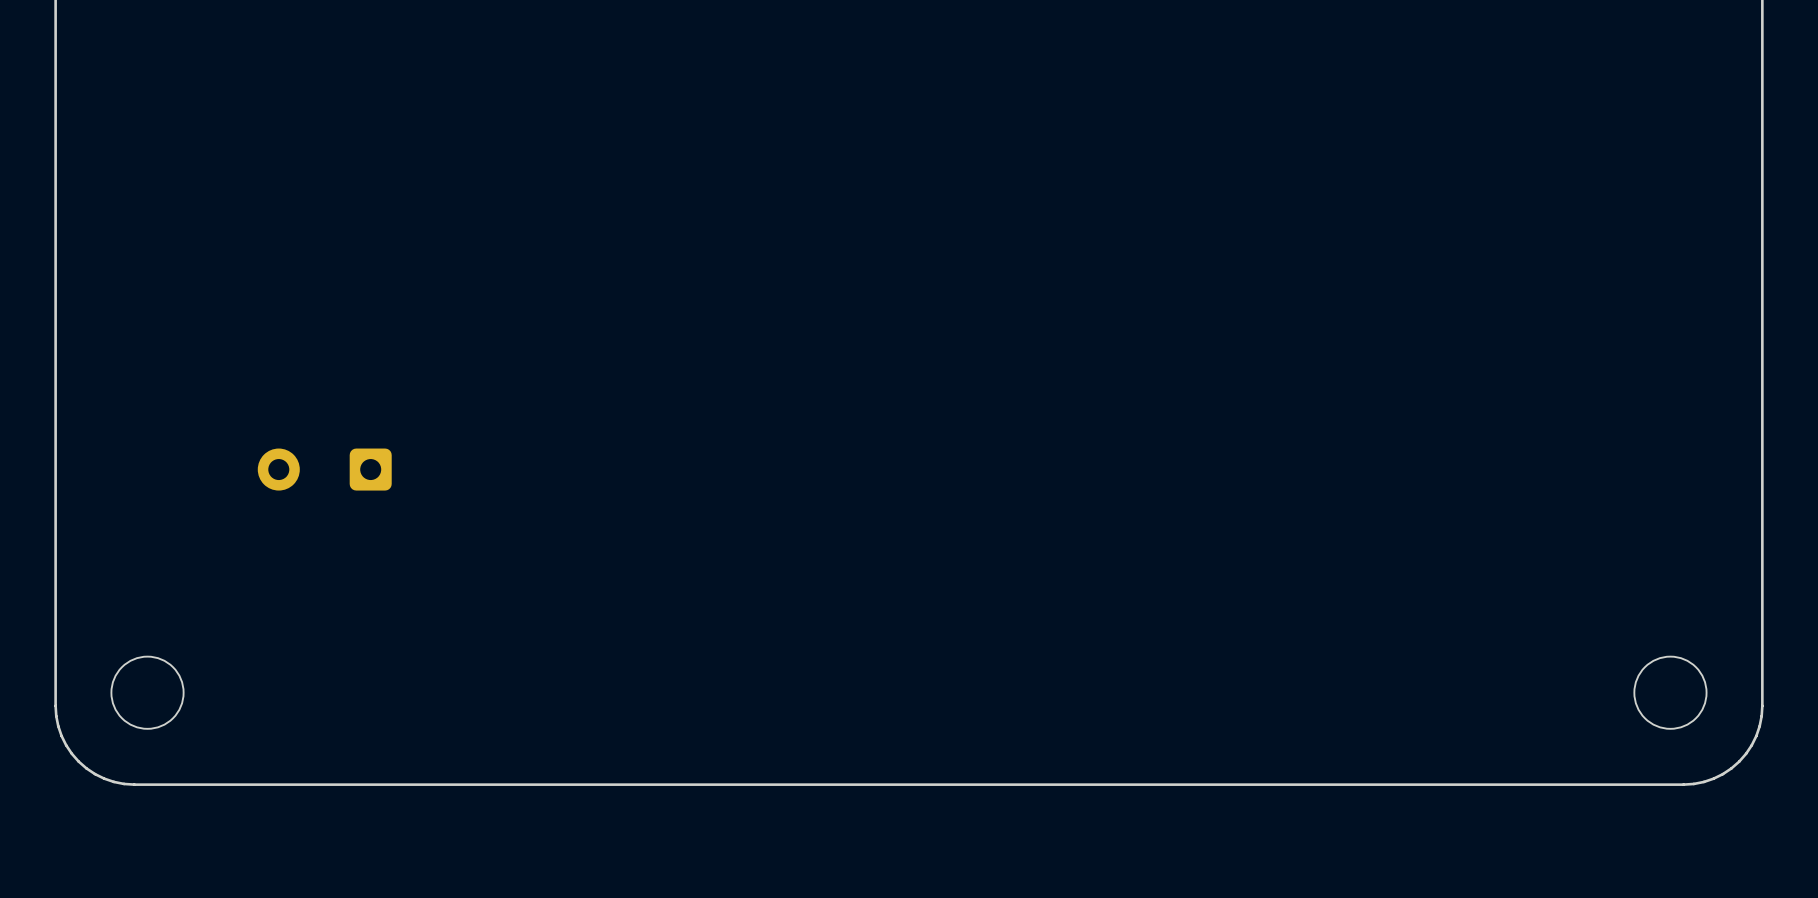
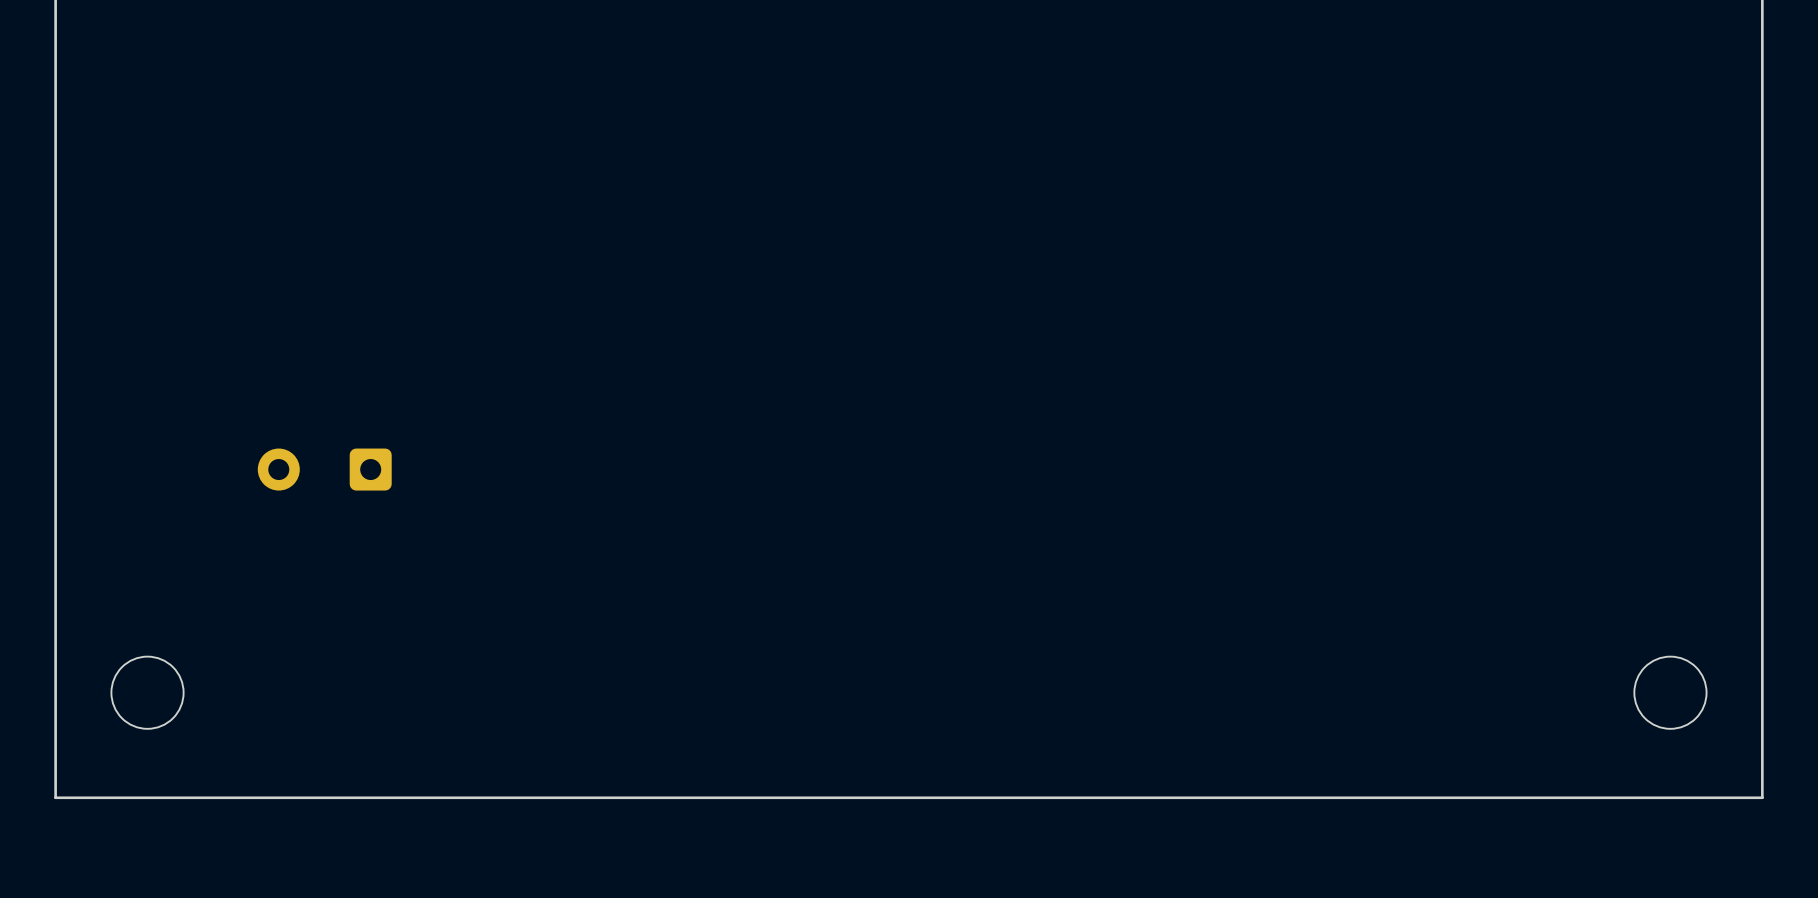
board edge: (1762, 705) (1756, 736) (1739, 761) (1713, 778) (1683, 784) (134, 784) (104, 778) (78, 761) (61, 736) (55, 705) -> (1762, 705) (1762, 797) (55, 797) (55, 705)

